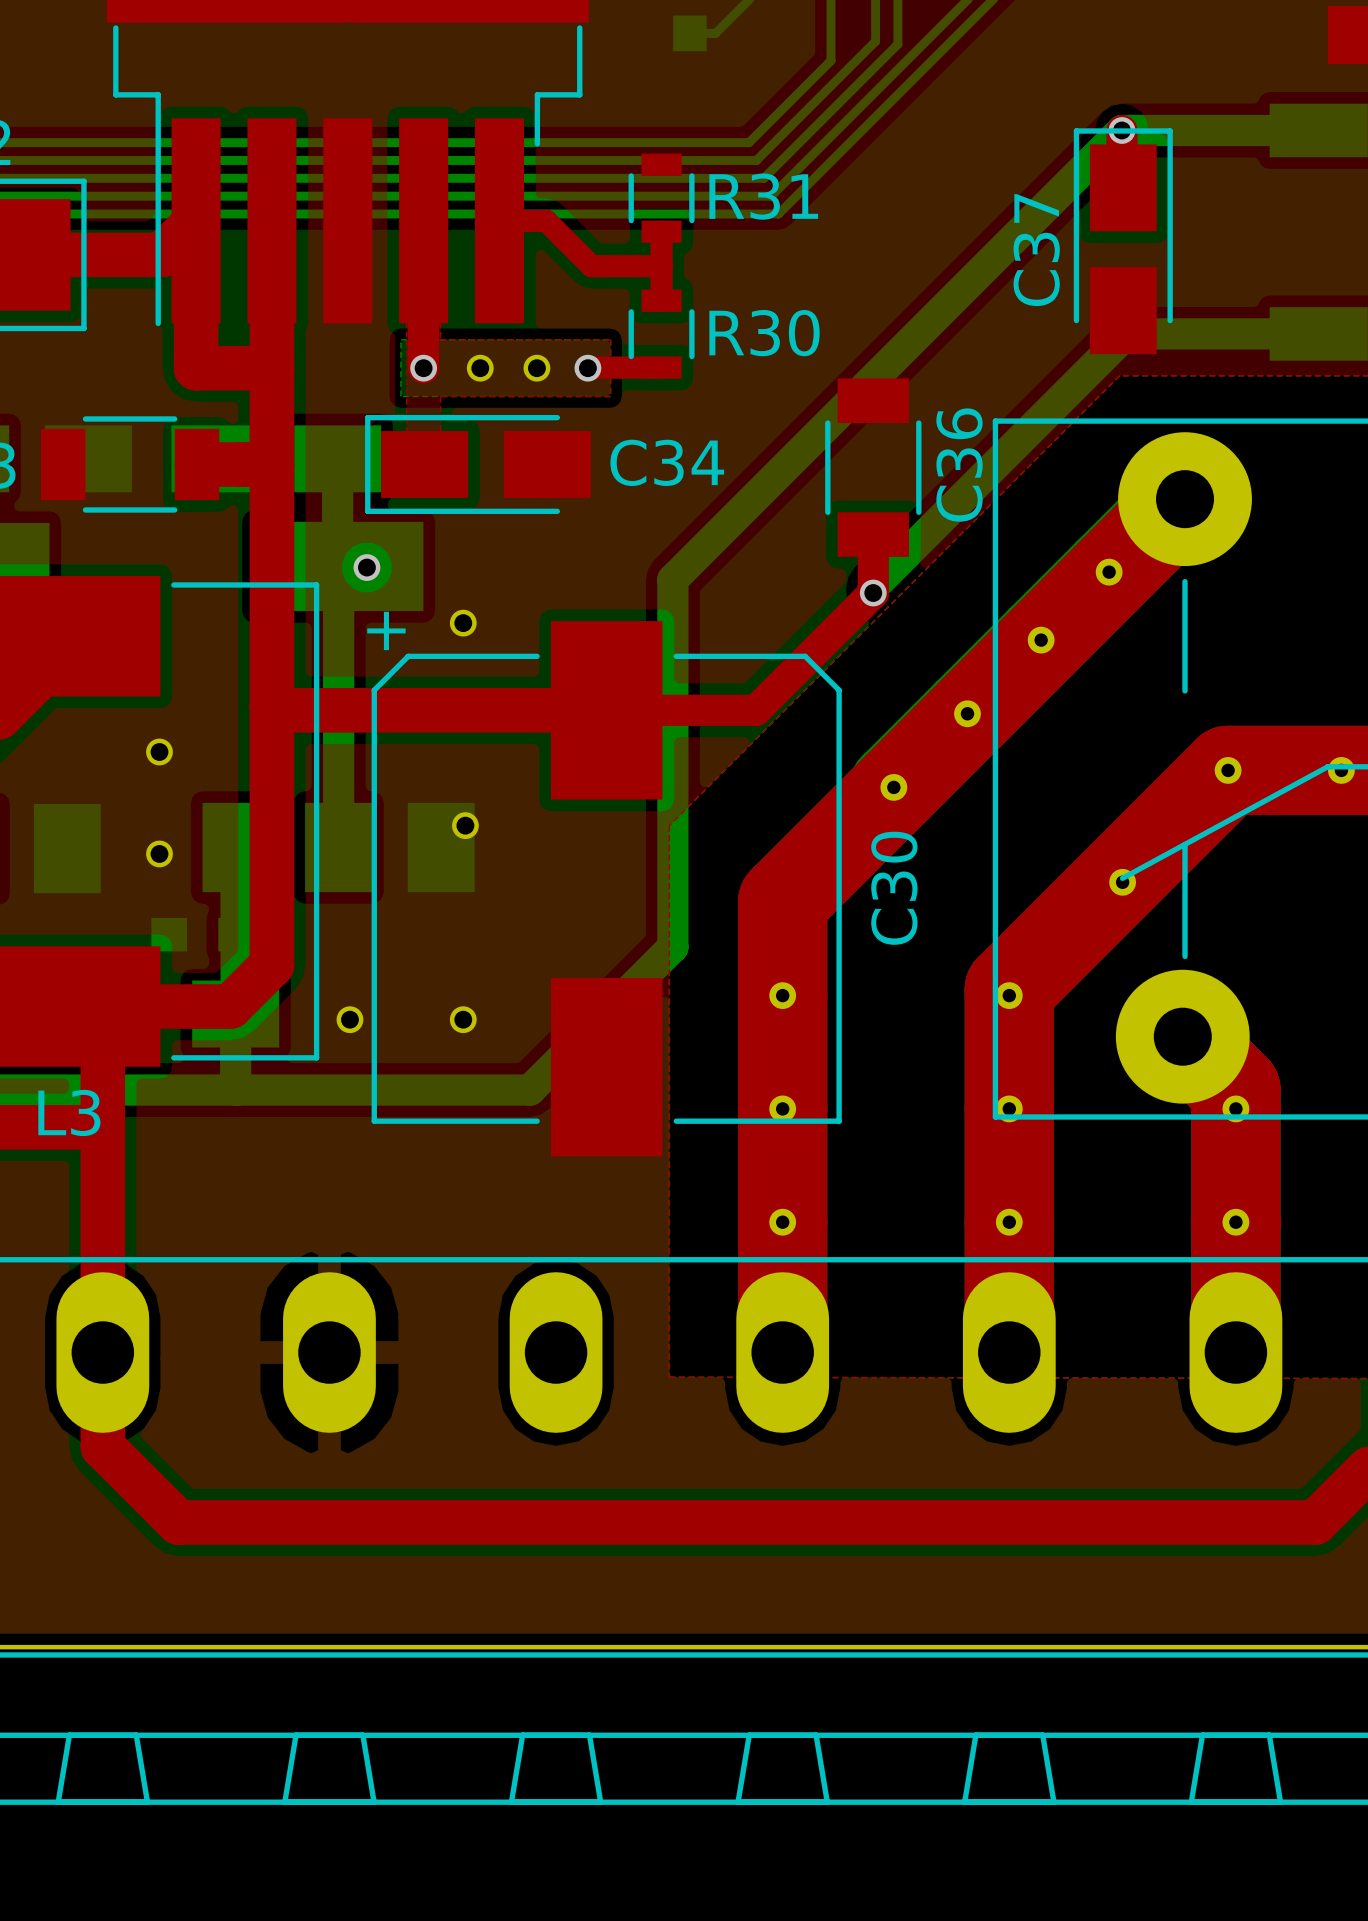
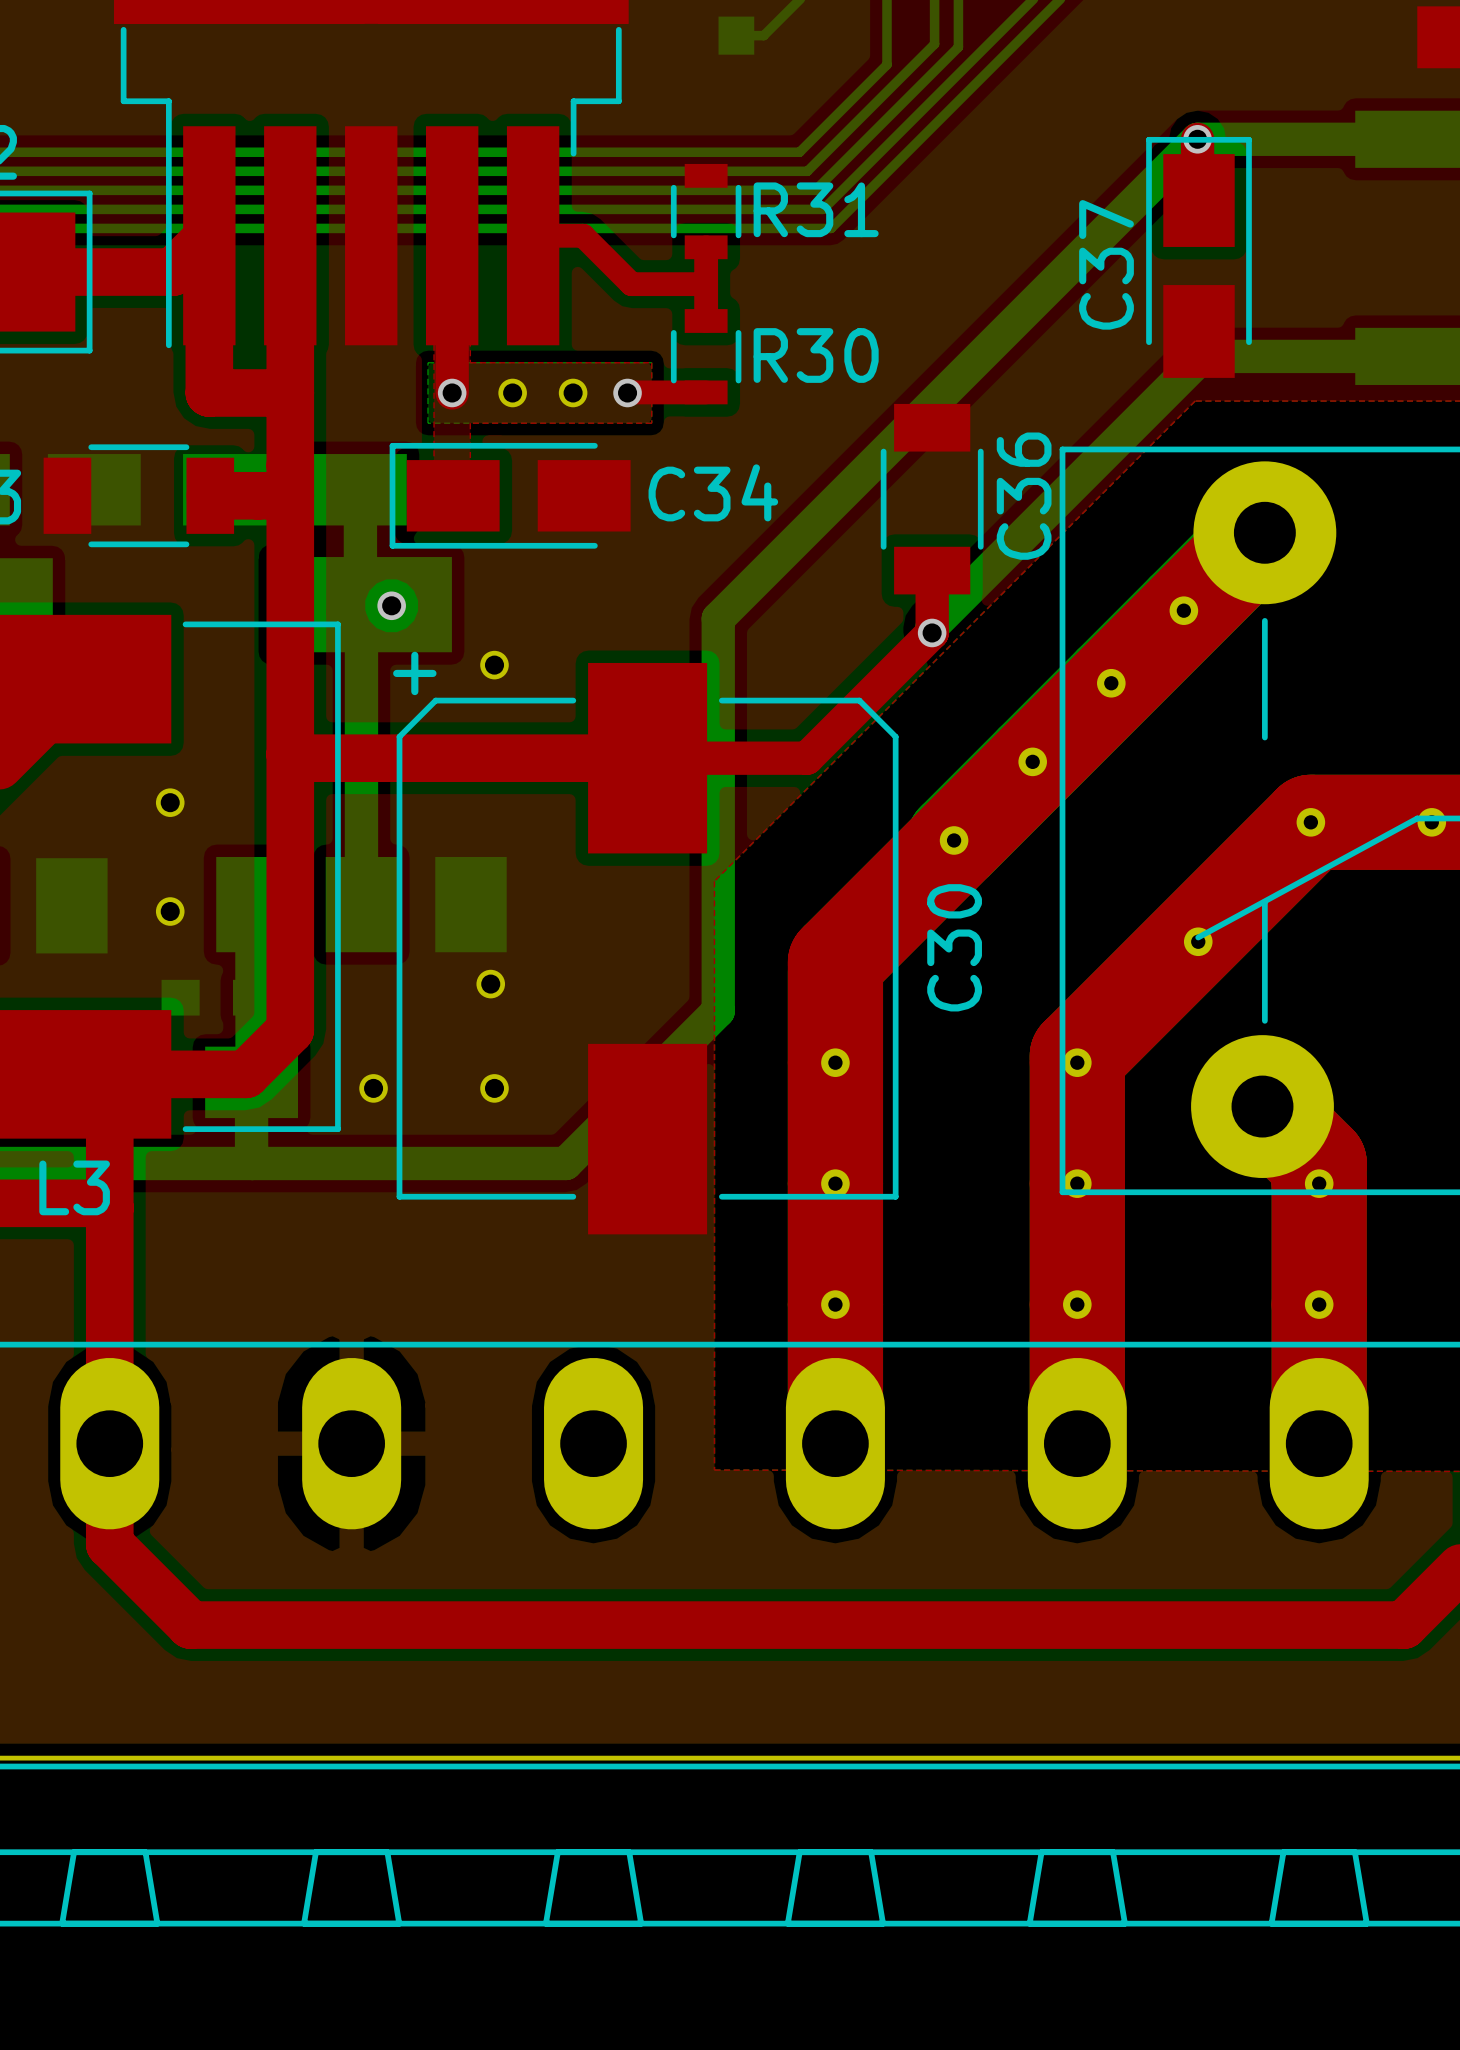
part position: (465, 825) -> (490, 984)

